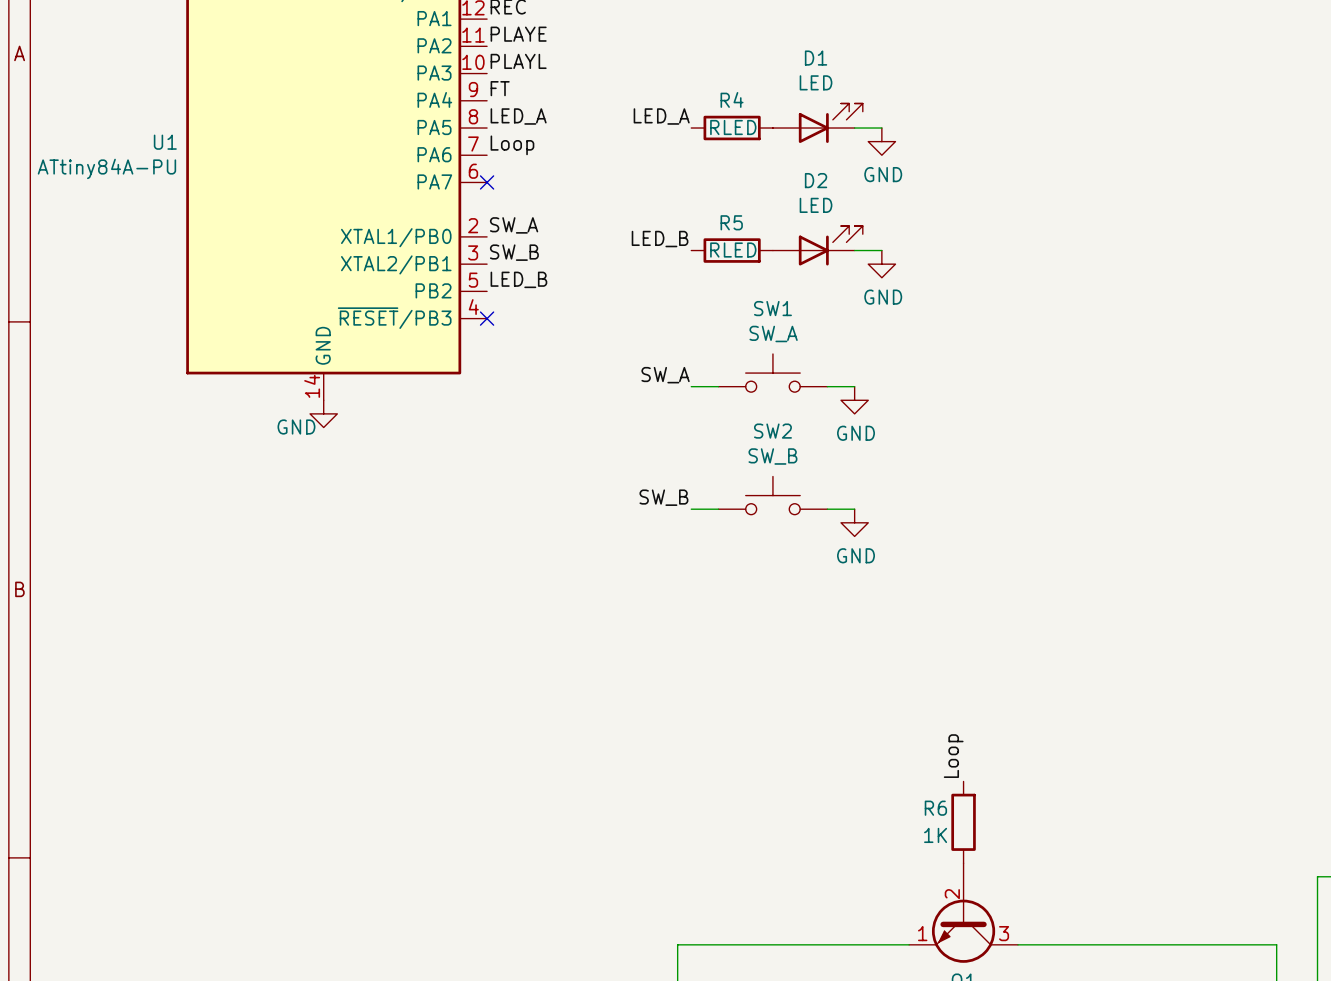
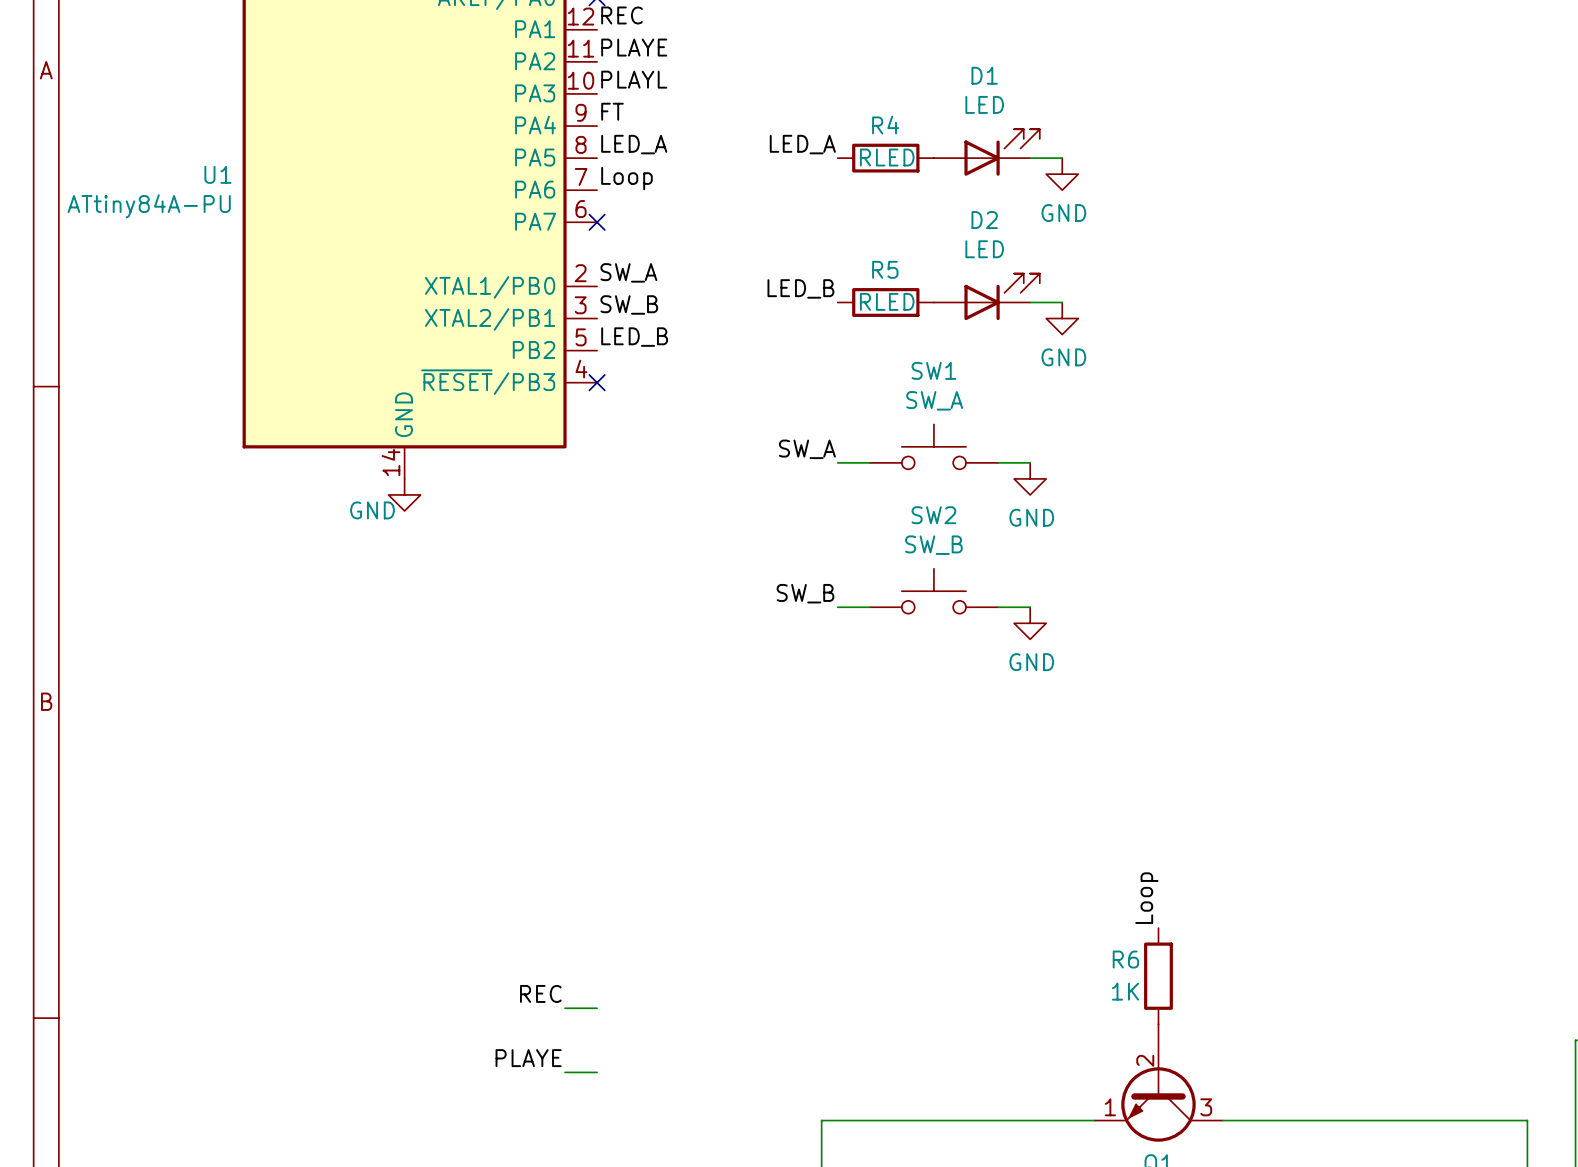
label: none -> REC (540, 993)
wire: none -> (565, 1008) (597, 1008)
label: none -> PLAYE (528, 1058)
wire: none -> (565, 1072) (597, 1072)

